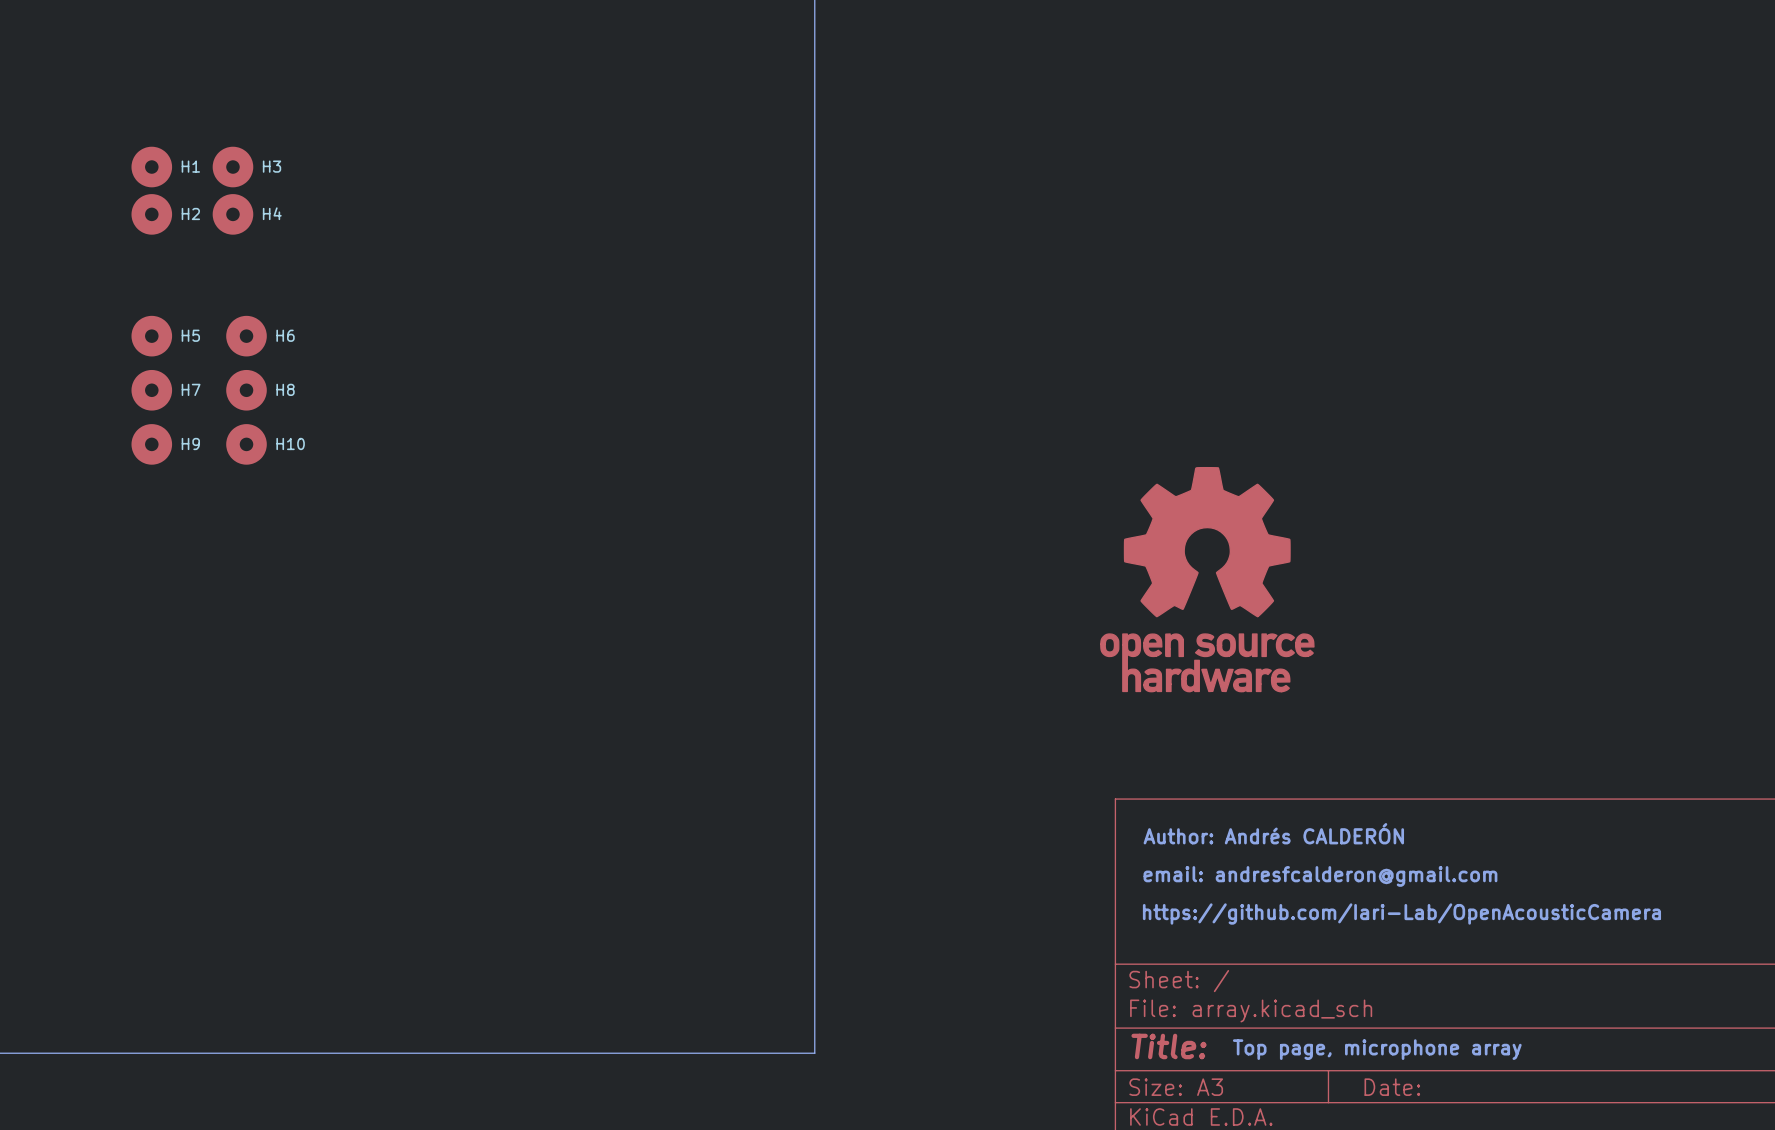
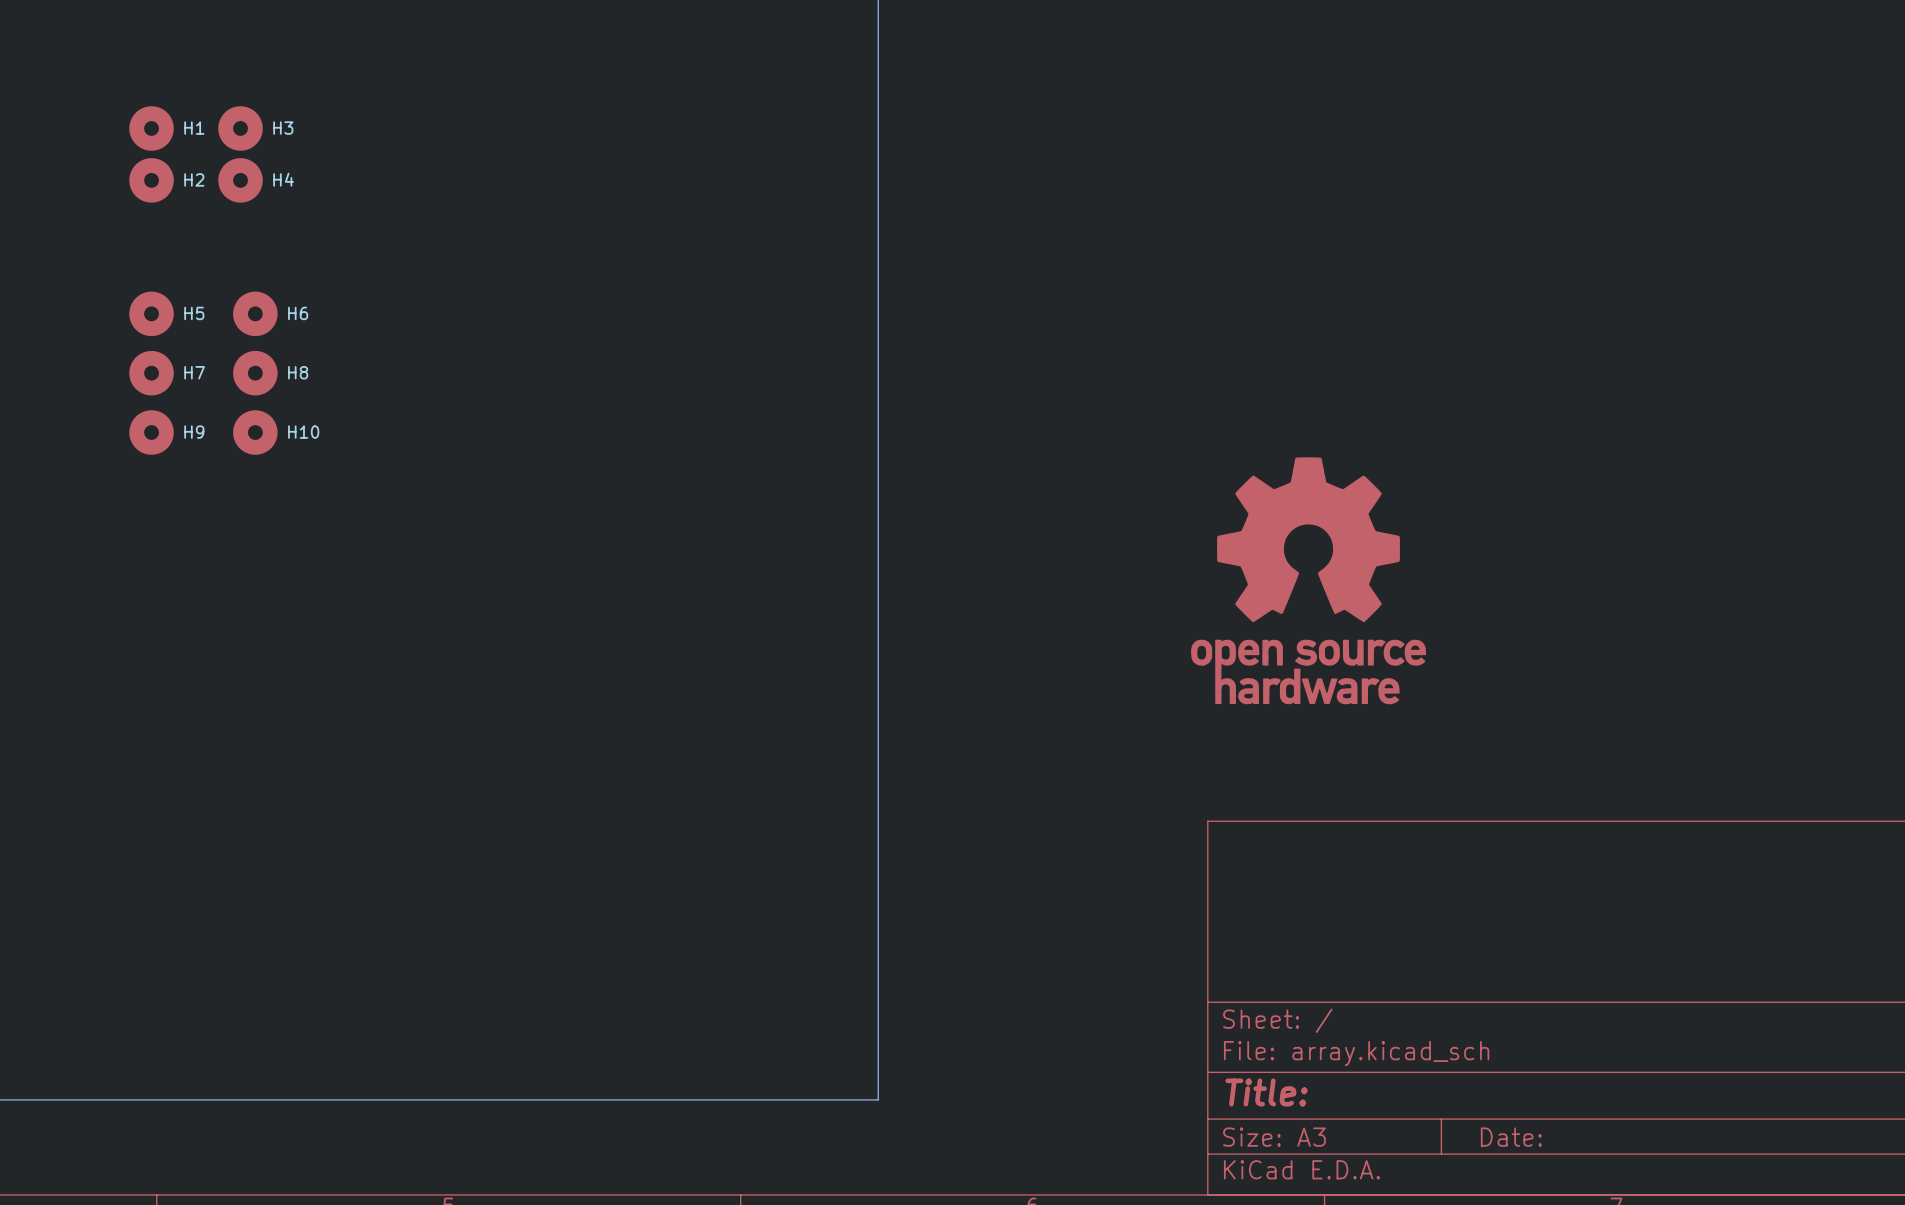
text: Author: Andrés CALDERÓN (1273, 833) -> none
text: email: andresfcalderon@gmail.com (1320, 876) -> none
text: https://github.com/Iari-Lab/OpenAcousticCamera (1401, 914) -> none
text: Top page, microphone array (1377, 1049) -> none

